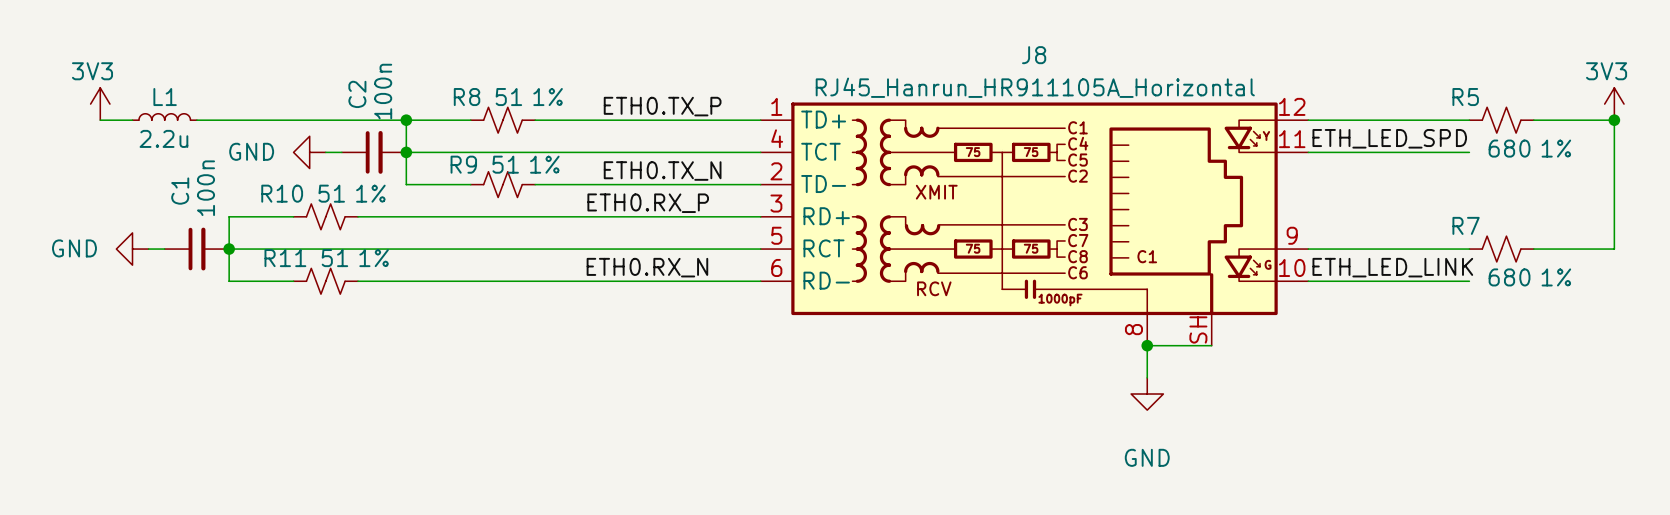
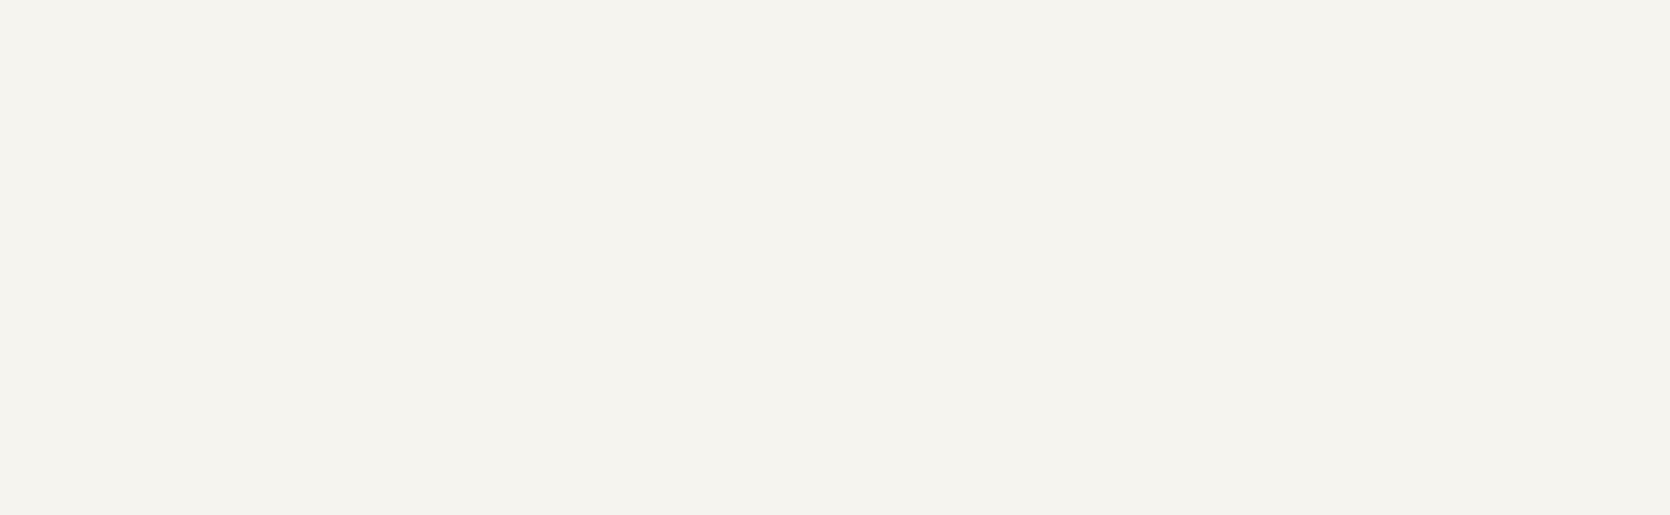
power symbol: 3V3 (100, 104) -> none
power symbol: 3V3 (1614, 104) -> none
label: ETH0.TX_P (662, 106) -> none
L1: 2.2u (164, 116) -> none
wire: (100, 120) (132, 120) -> none
wire: (196, 120) (470, 120) -> none
wire: (406, 120) (406, 184) (470, 184) -> none
junction: (406, 120) -> none
R8: 51 (502, 120) -> none
wire: (535, 120) (760, 120) -> none
wire: (1308, 120) (1469, 120) -> none
R5: 680 (1501, 120) -> none
wire: (1533, 120) (1614, 120) (1614, 249) (1533, 249) -> none
junction: (1614, 120) -> none
label: ETH_LED_SPD (1389, 138) -> none
power symbol: GND (309, 152) -> none
wire: (325, 152) (341, 152) -> none
C2: 100n (374, 152) -> none
wire: (406, 152) (760, 152) -> none
junction: (406, 152) -> none
wire: (1308, 152) (1469, 152) -> none
label: ETH0.TX_N (662, 171) -> none
R9: 51 (502, 184) -> none
wire: (535, 184) (760, 184) -> none
label: ETH0.RX_P (648, 203) -> none
wire: (293, 216) (229, 216) (229, 281) (293, 281) -> none
R10: 51 (325, 216) -> none
wire: (358, 216) (760, 216) -> none
J8: RJ45_Hanrun_HR911105A_Horizontal (1034, 224) -> none
power symbol: GND (132, 249) -> none
wire: (148, 249) (164, 249) -> none
C1: 100n (196, 249) -> none
wire: (229, 249) (760, 249) -> none
junction: (229, 249) -> none
wire: (1308, 249) (1469, 249) -> none
R7: 680 (1501, 249) -> none
label: ETH0.RX_N (647, 267) -> none
label: ETH_LED_LINK (1392, 267) -> none
R11: 51 (325, 281) -> none
wire: (358, 281) (760, 281) -> none
wire: (1308, 281) (1469, 281) -> none
junction: (1147, 345) -> none
wire: (1211, 345) (1147, 345) (1147, 377) -> none
power symbol: GND (1147, 394) -> none

